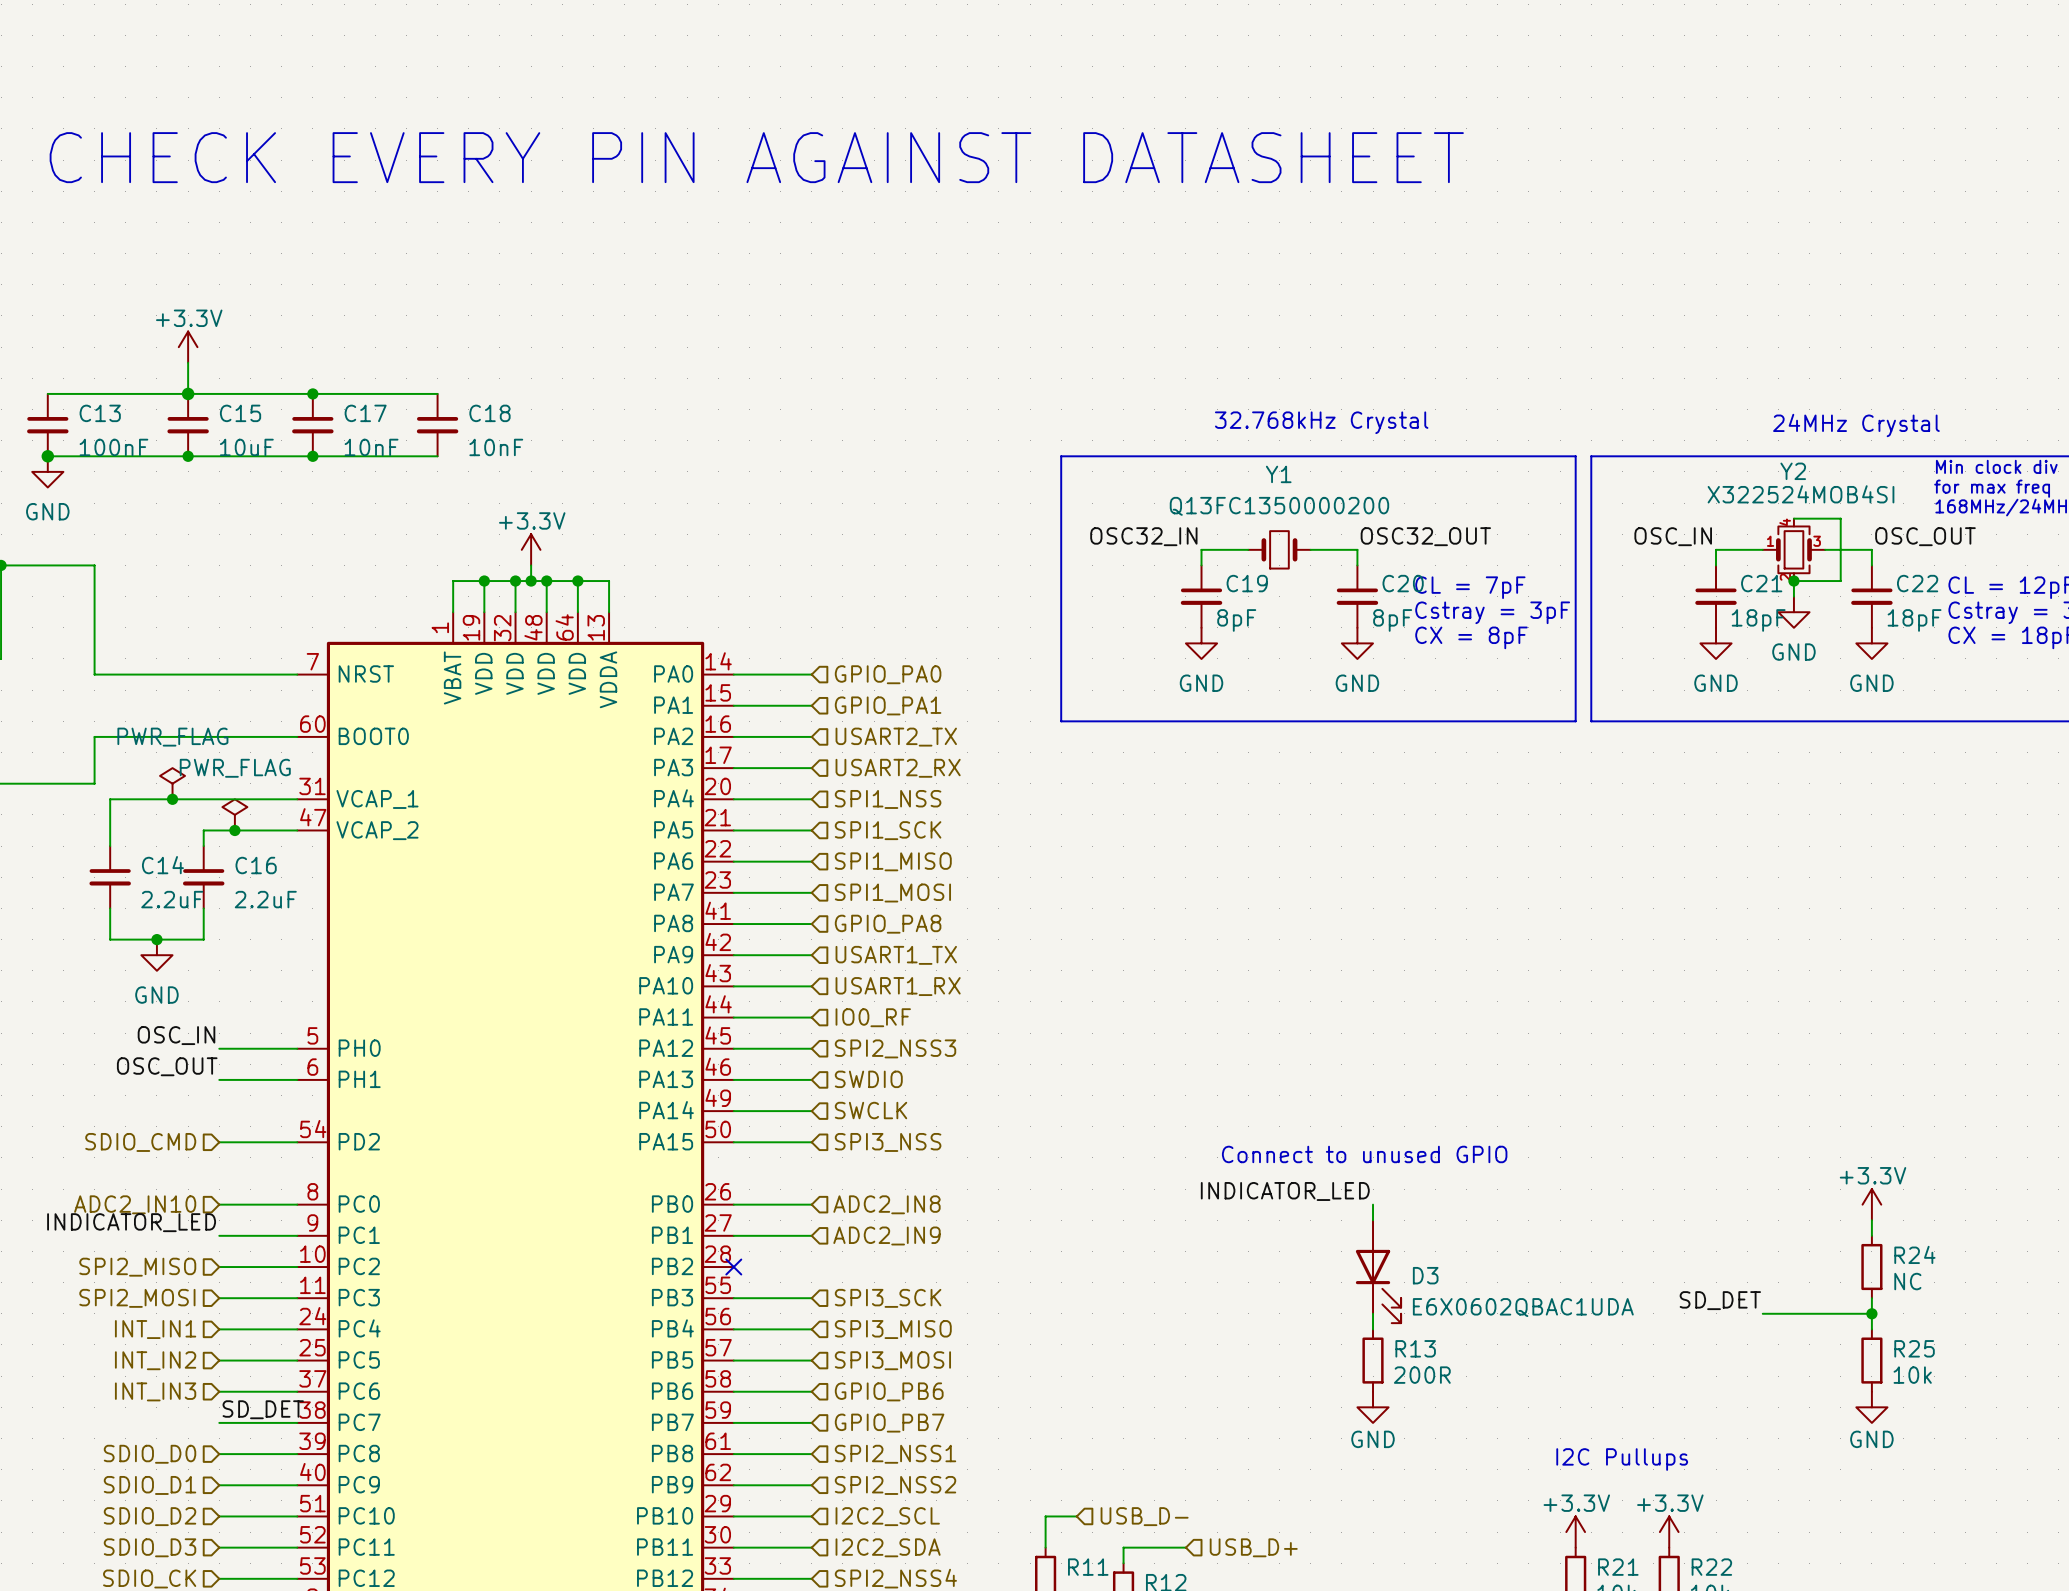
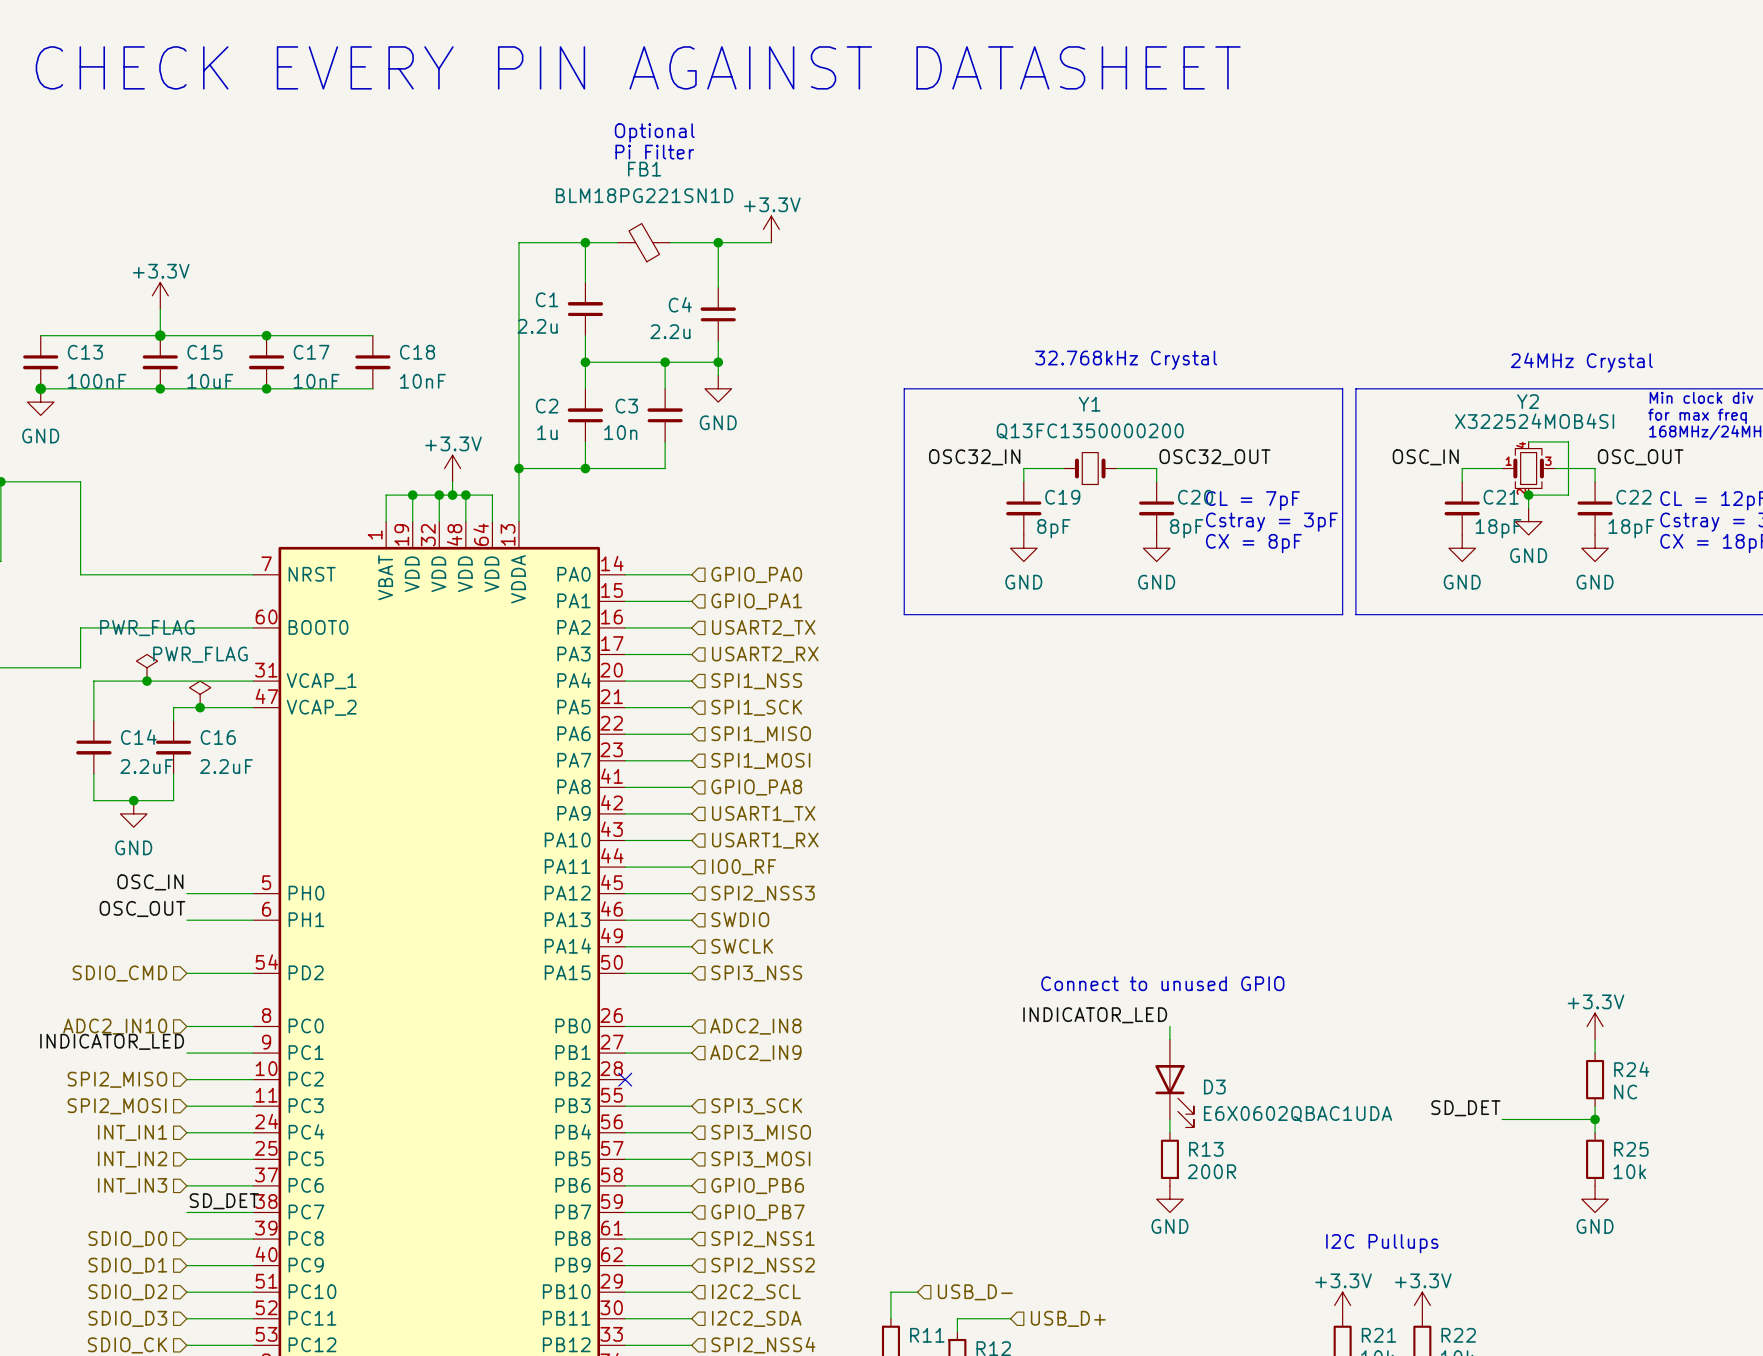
text: none -> Optional (654, 132)
text position: CHECK EVERY PIN AGAINST DATASHEET (756, 157) -> CHECK EVERY PIN AGAINST DATASHEET (638, 67)
text: none -> Pi Filter (654, 152)
power symbol: none -> +3.3V (771, 229)
wire: none -> (585, 242) (585, 282)
junction: none -> (585, 242)
FB1: none -> BLM18PG221SN1D (643, 242)
wire: none -> (670, 242) (771, 242)
wire: none -> (718, 242) (718, 287)
junction: none -> (718, 242)
C1: none -> 2.2u (585, 309)
C4: none -> 2.2u (718, 314)
wire: none -> (585, 335) (585, 388)
wire: none -> (718, 340) (718, 375)
wire: none -> (585, 362) (718, 362)
junction: none -> (585, 362)
wire: none -> (665, 362) (665, 388)
junction: none -> (665, 362)
junction: none -> (718, 362)
power symbol: none -> GND (718, 388)
C2: none -> 1u (585, 415)
C3: none -> 10n (665, 415)
wire: none -> (585, 441) (585, 468)
wire: none -> (665, 441) (665, 468) (518, 468)
junction: none -> (585, 468)
wire: (577, 581) (609, 581) -> (617, 242) (518, 242) (518, 495)
junction position: (577, 581) -> (518, 468)

